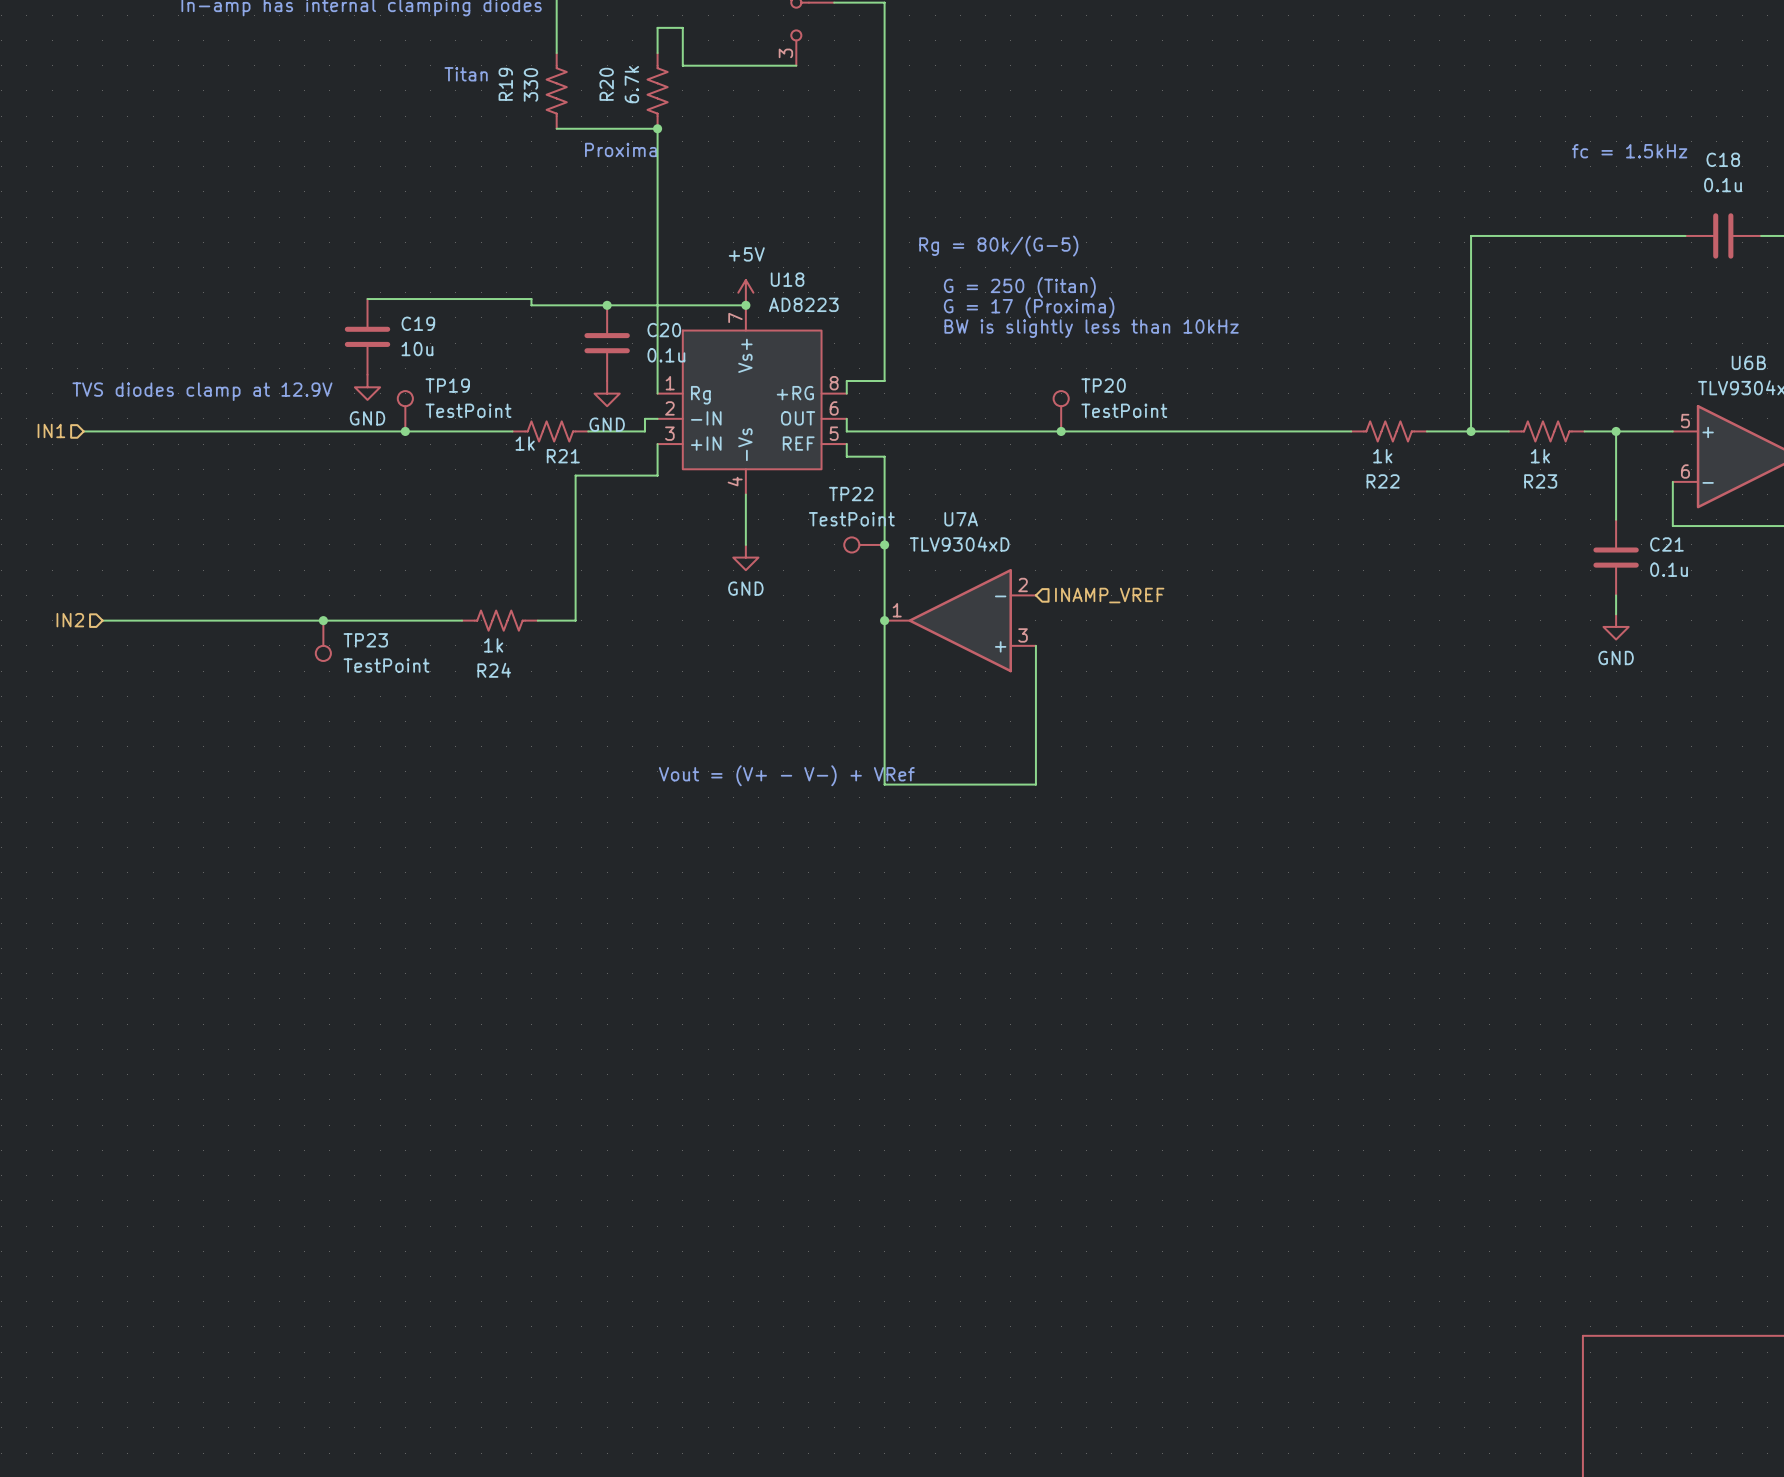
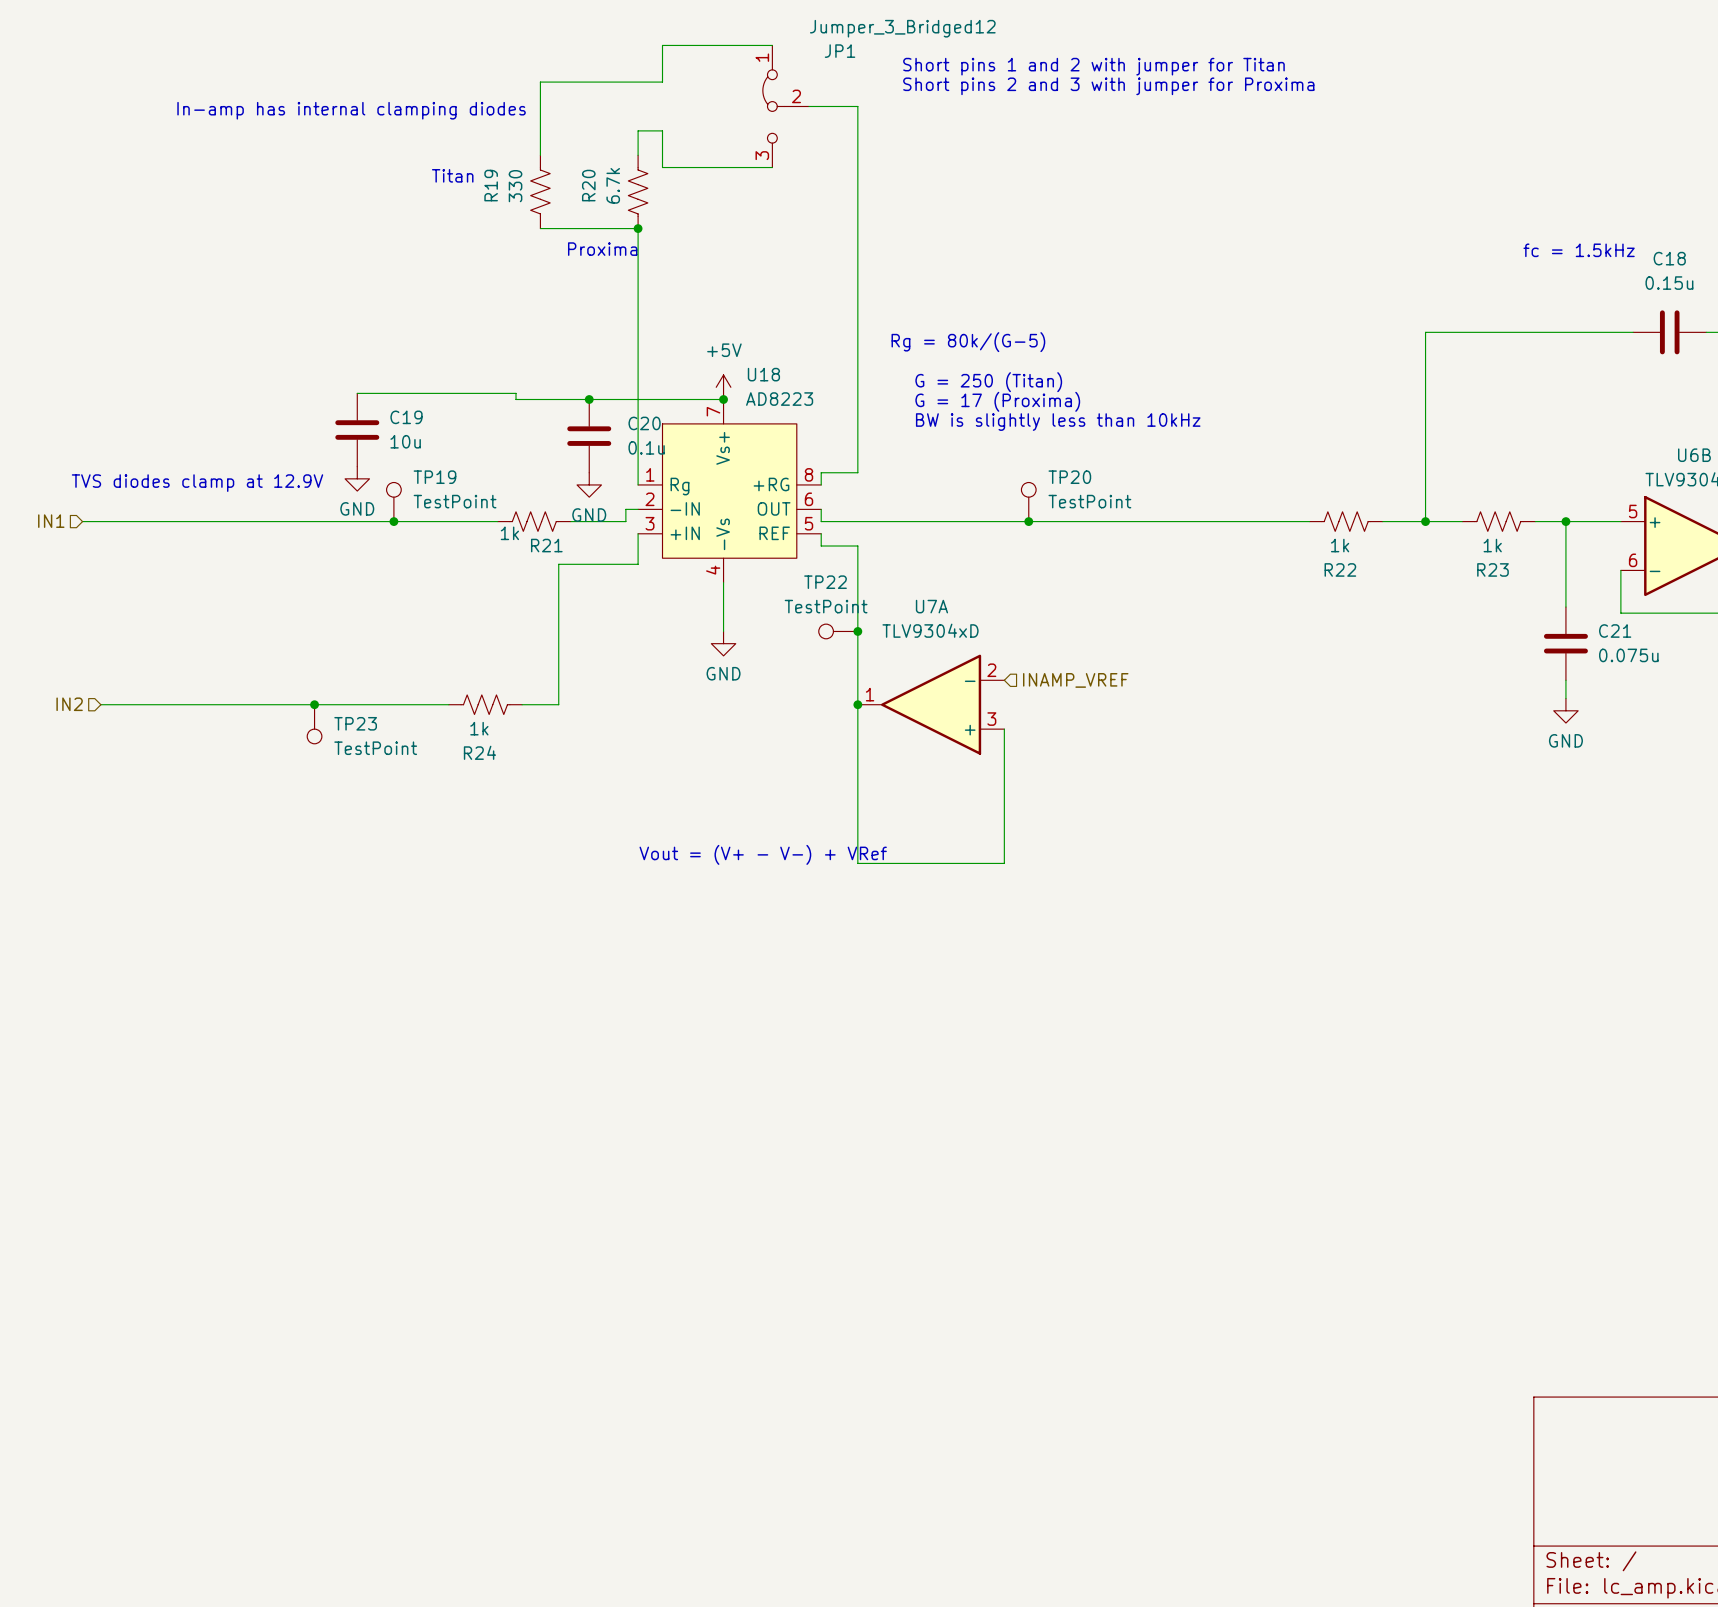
C18 value: 0.1u (1722, 185) -> 0.15u (1669, 283)
C21 value: 0.1u (1669, 569) -> 0.075u (1628, 655)

